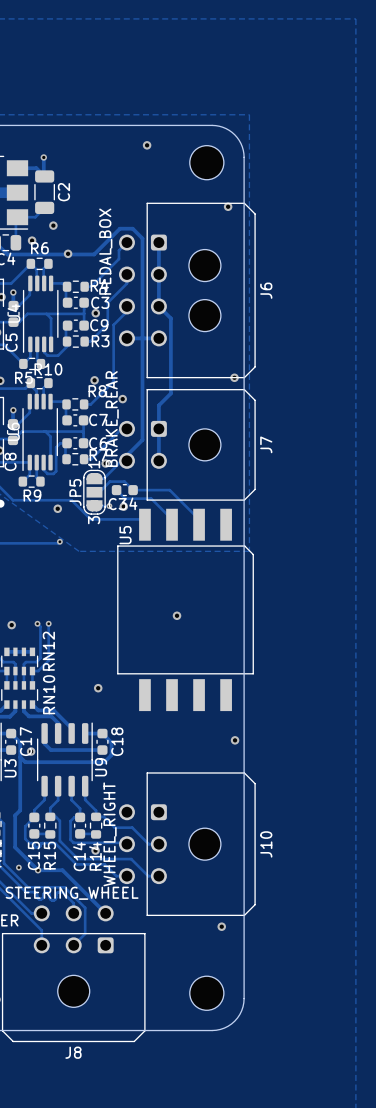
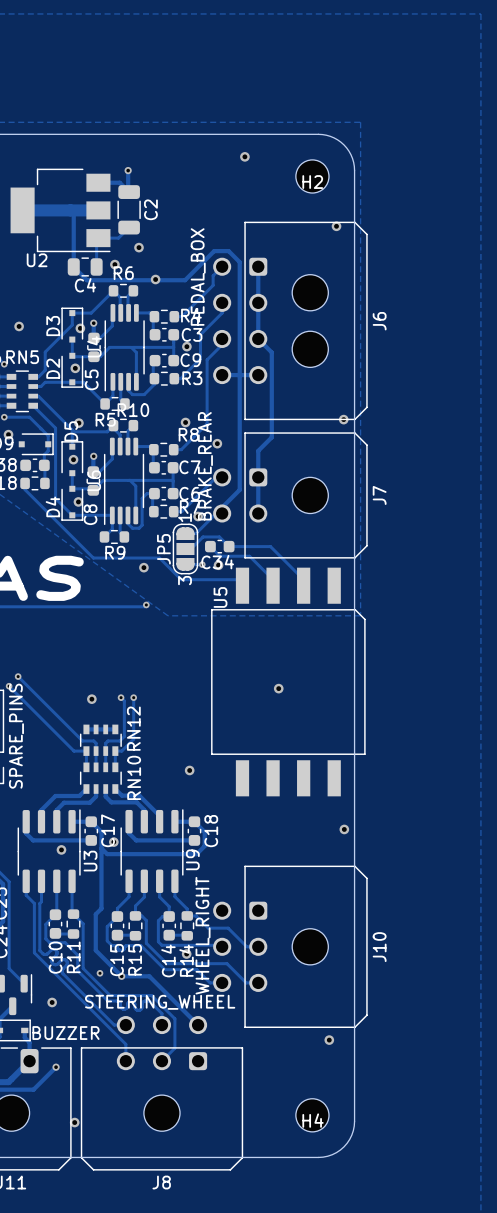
part: (206, 162) -> none
H2: none -> (312, 176)
part: (206, 993) -> none
H4: none -> (312, 1115)

